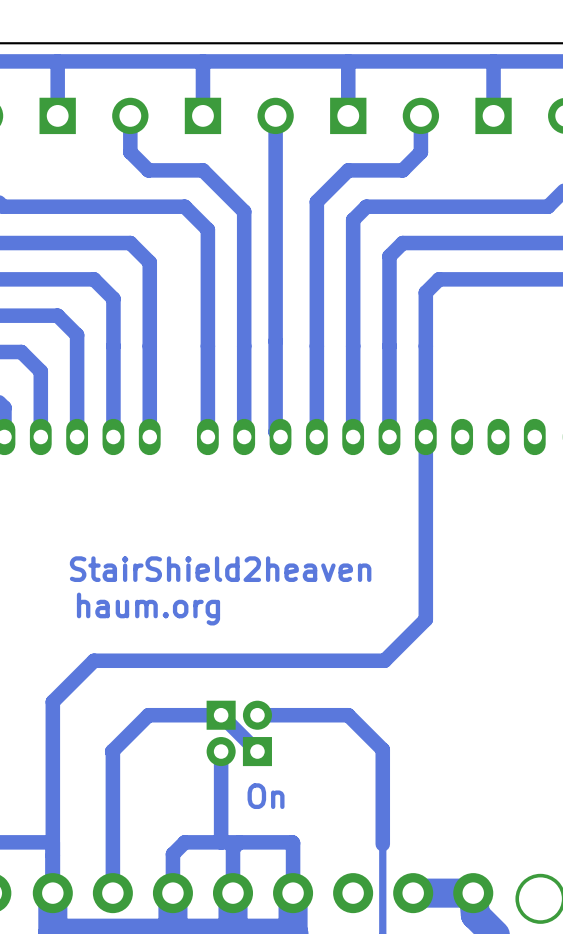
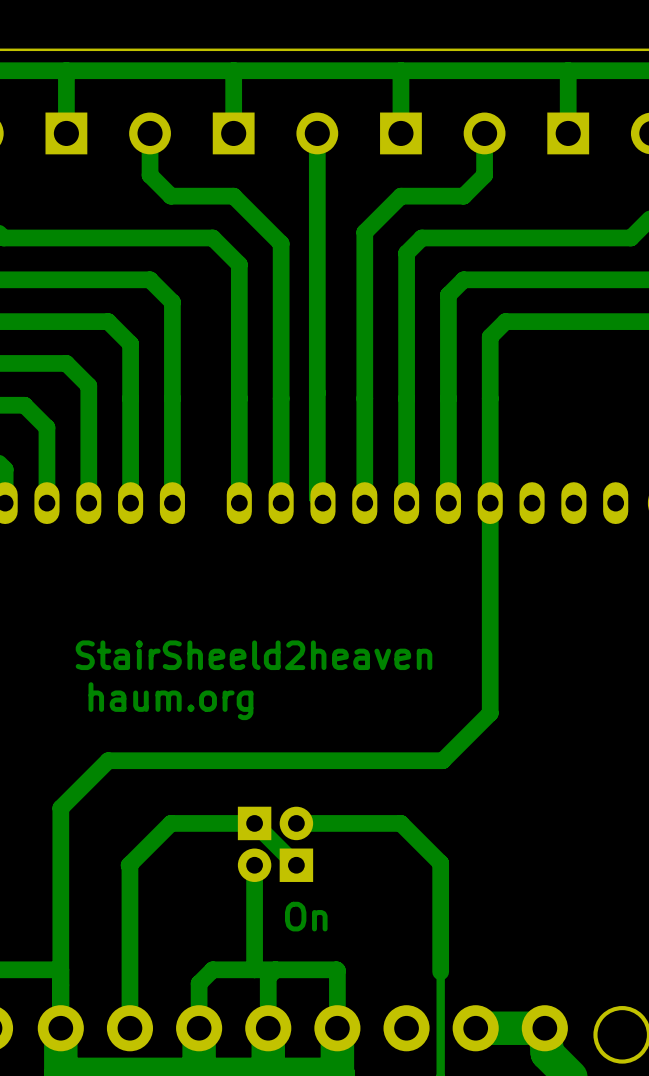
text: StairShield2heaven (220, 569) -> StairSheeld2heaven (254, 655)

